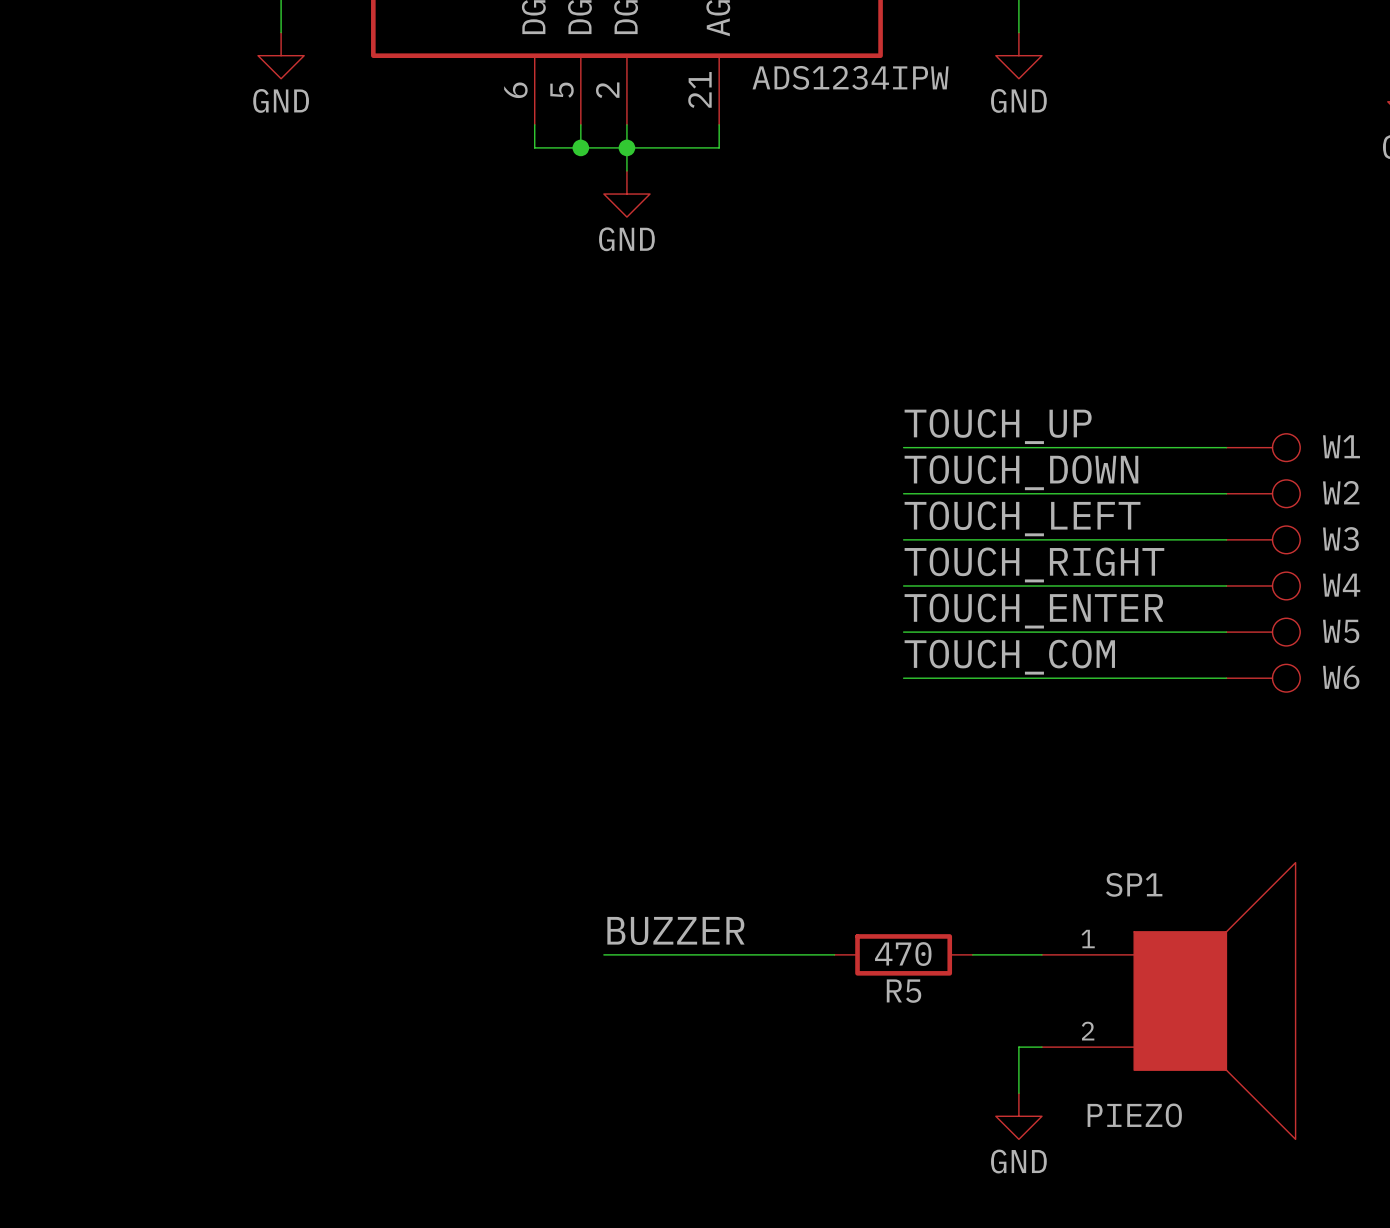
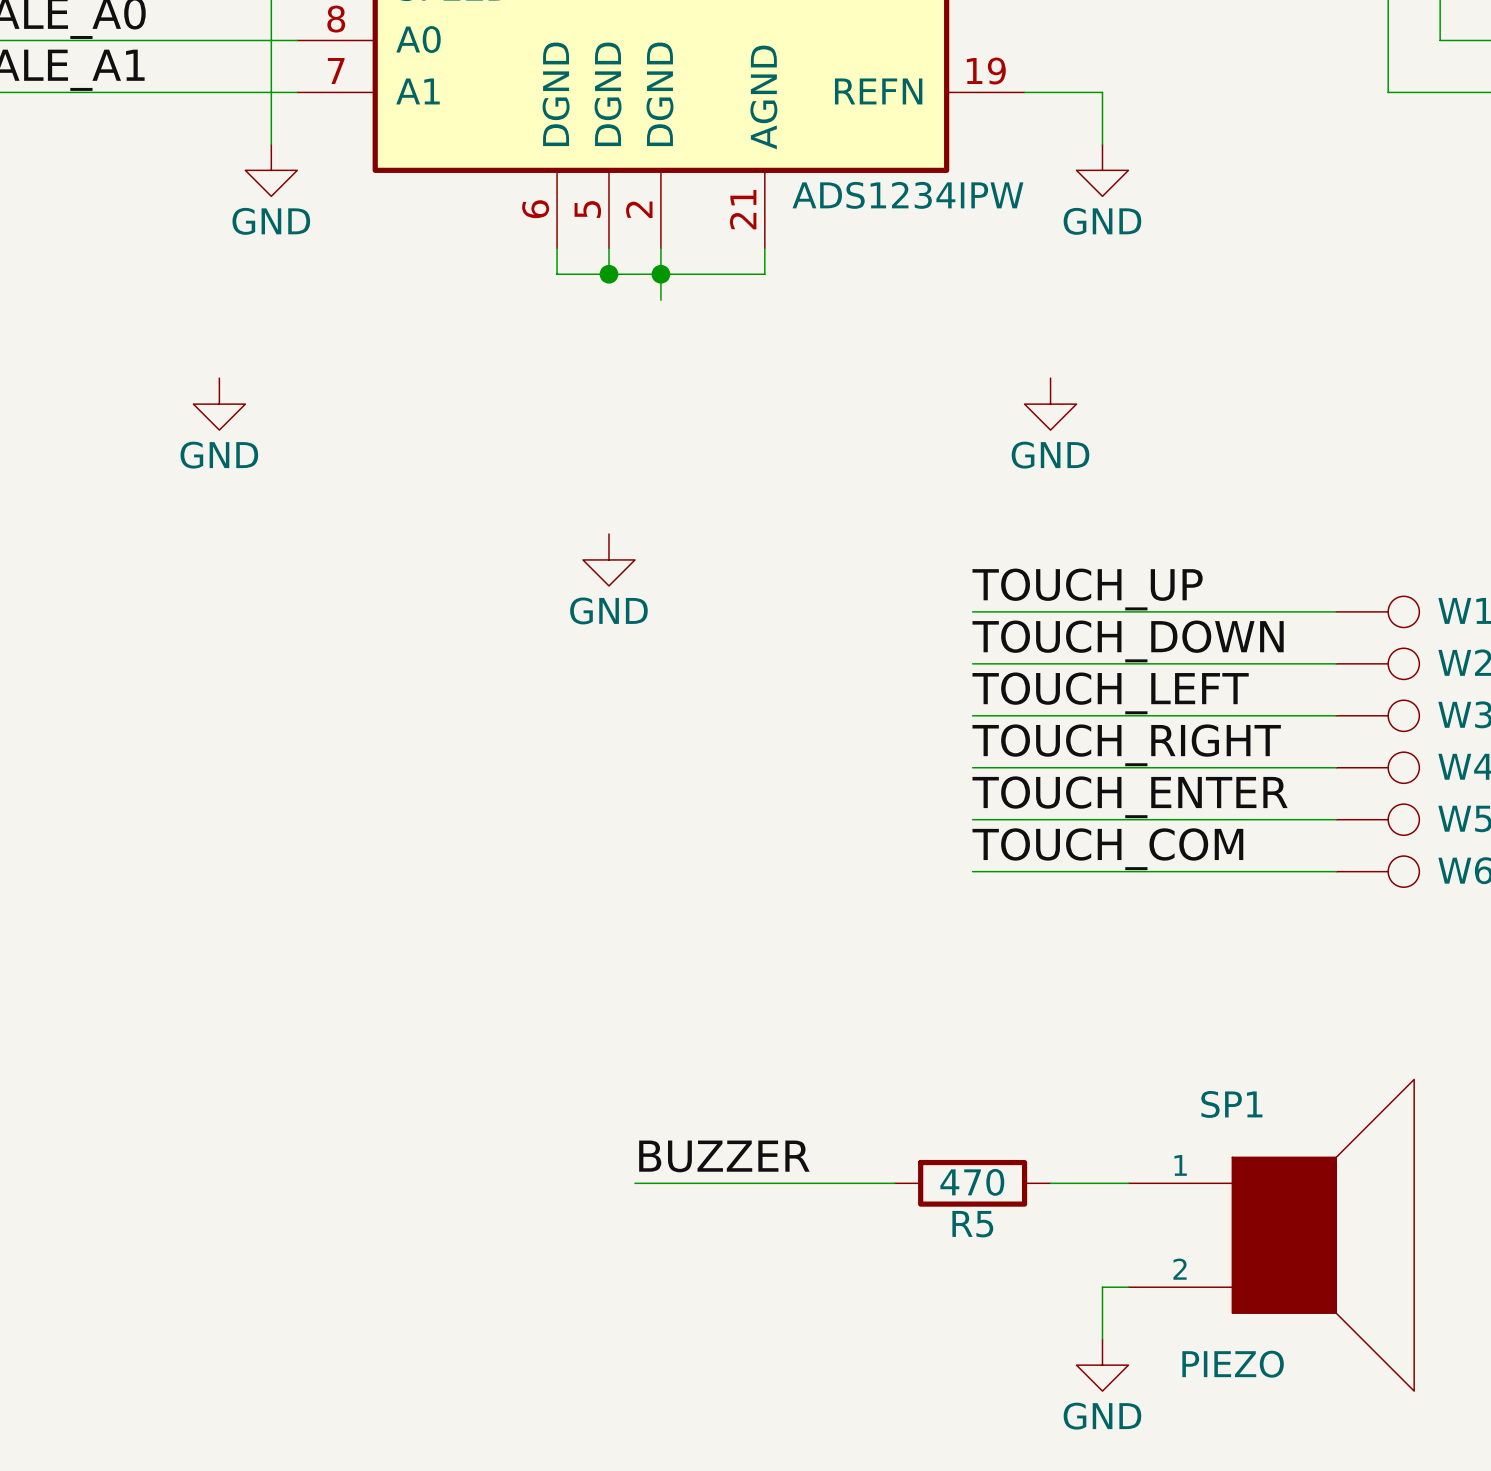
power symbol: GND (626, 194) -> none
power symbol: none -> GND (219, 404)
power symbol: none -> GND (1050, 404)
power symbol: none -> GND (608, 559)

